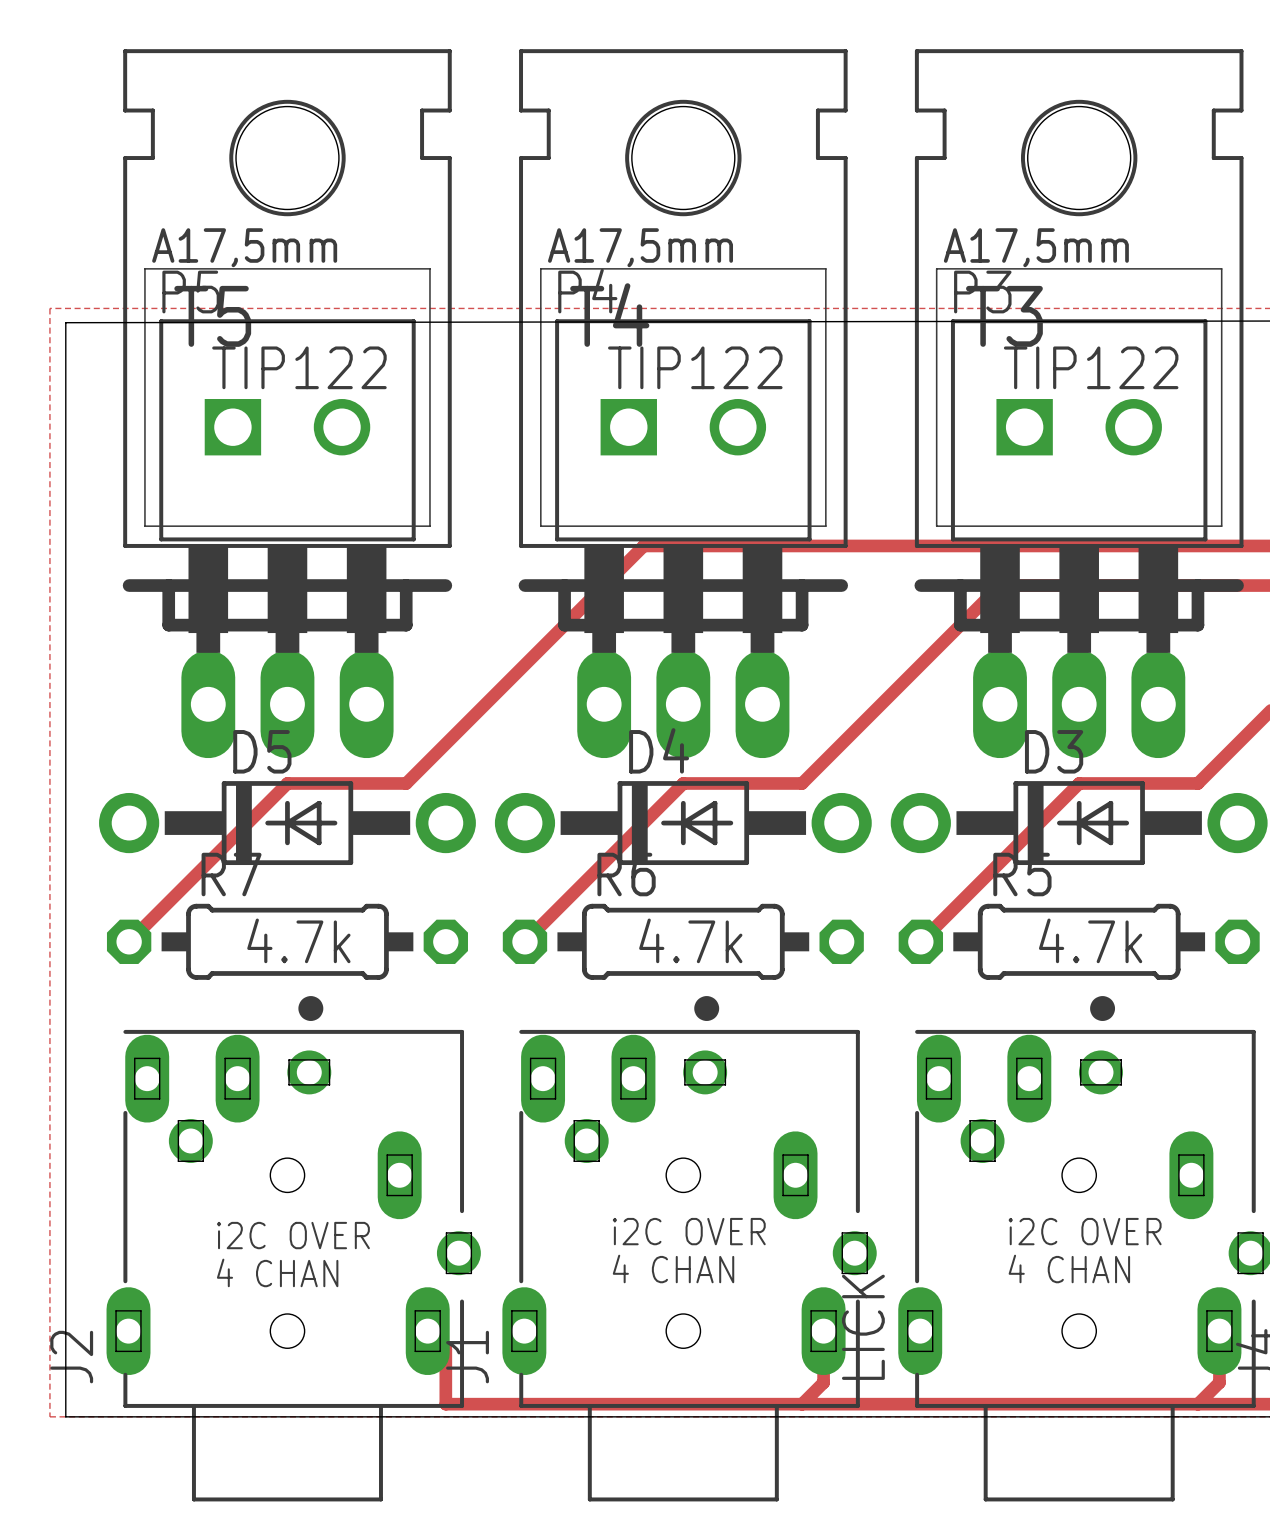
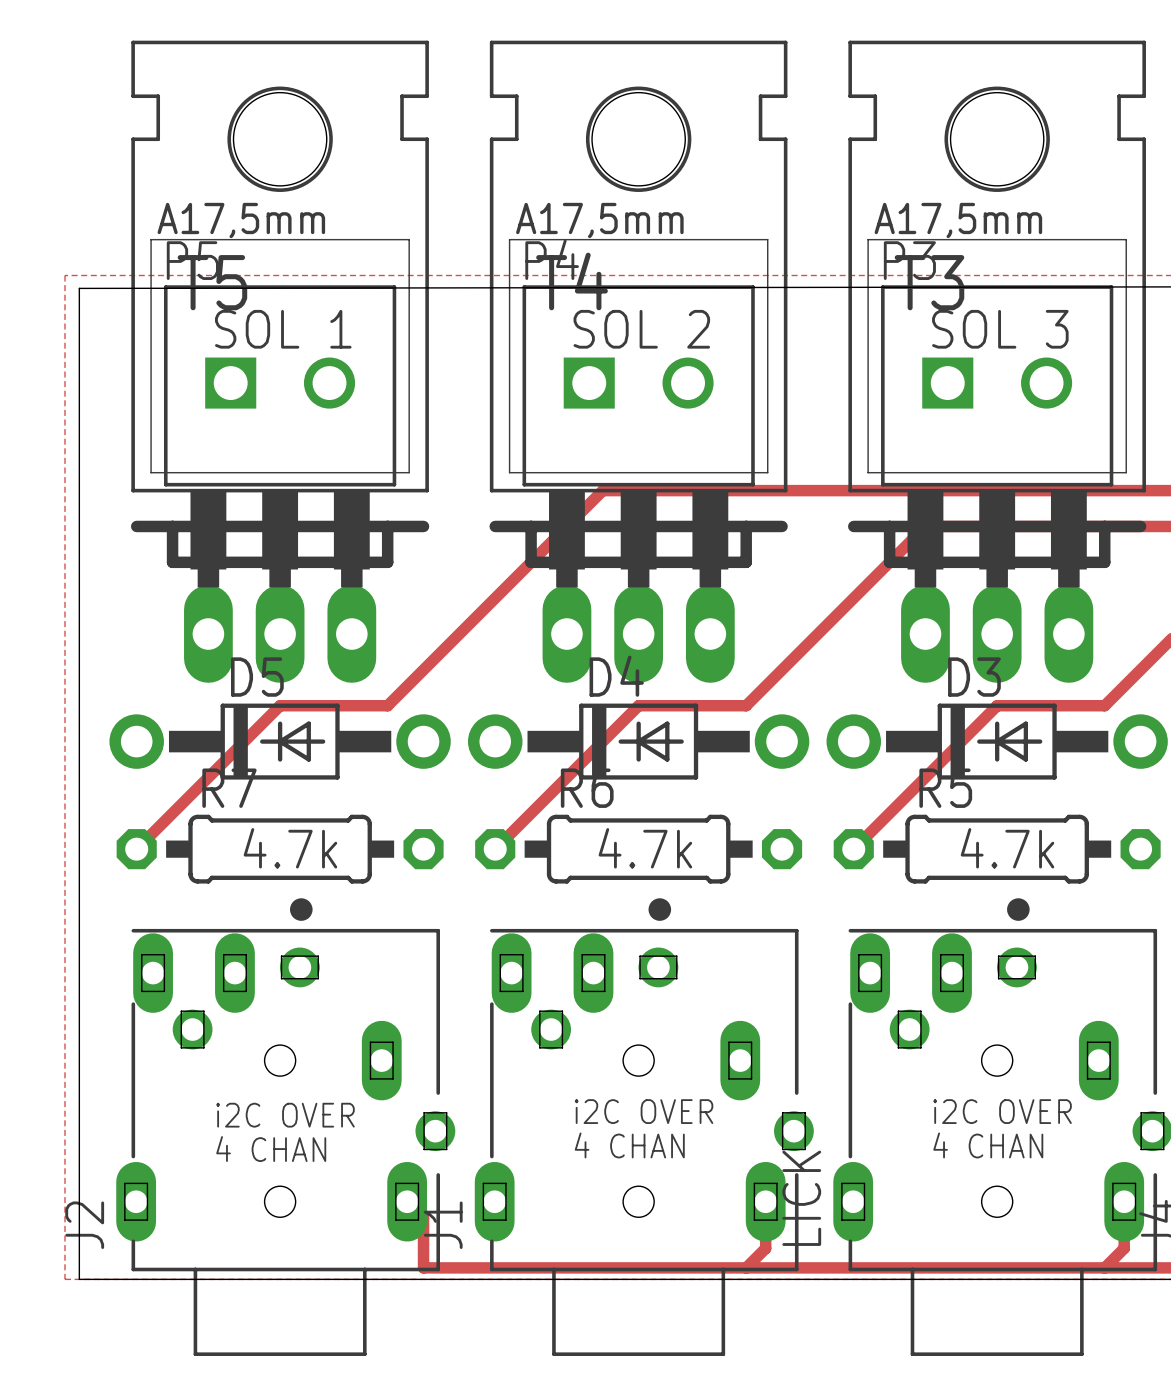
text: TIP122 (299, 367) -> SOL 1 (283, 329)
text: TIP122 (695, 367) -> SOL 2 (641, 329)
text: TIP122 (1091, 367) -> SOL 3 (1000, 329)

